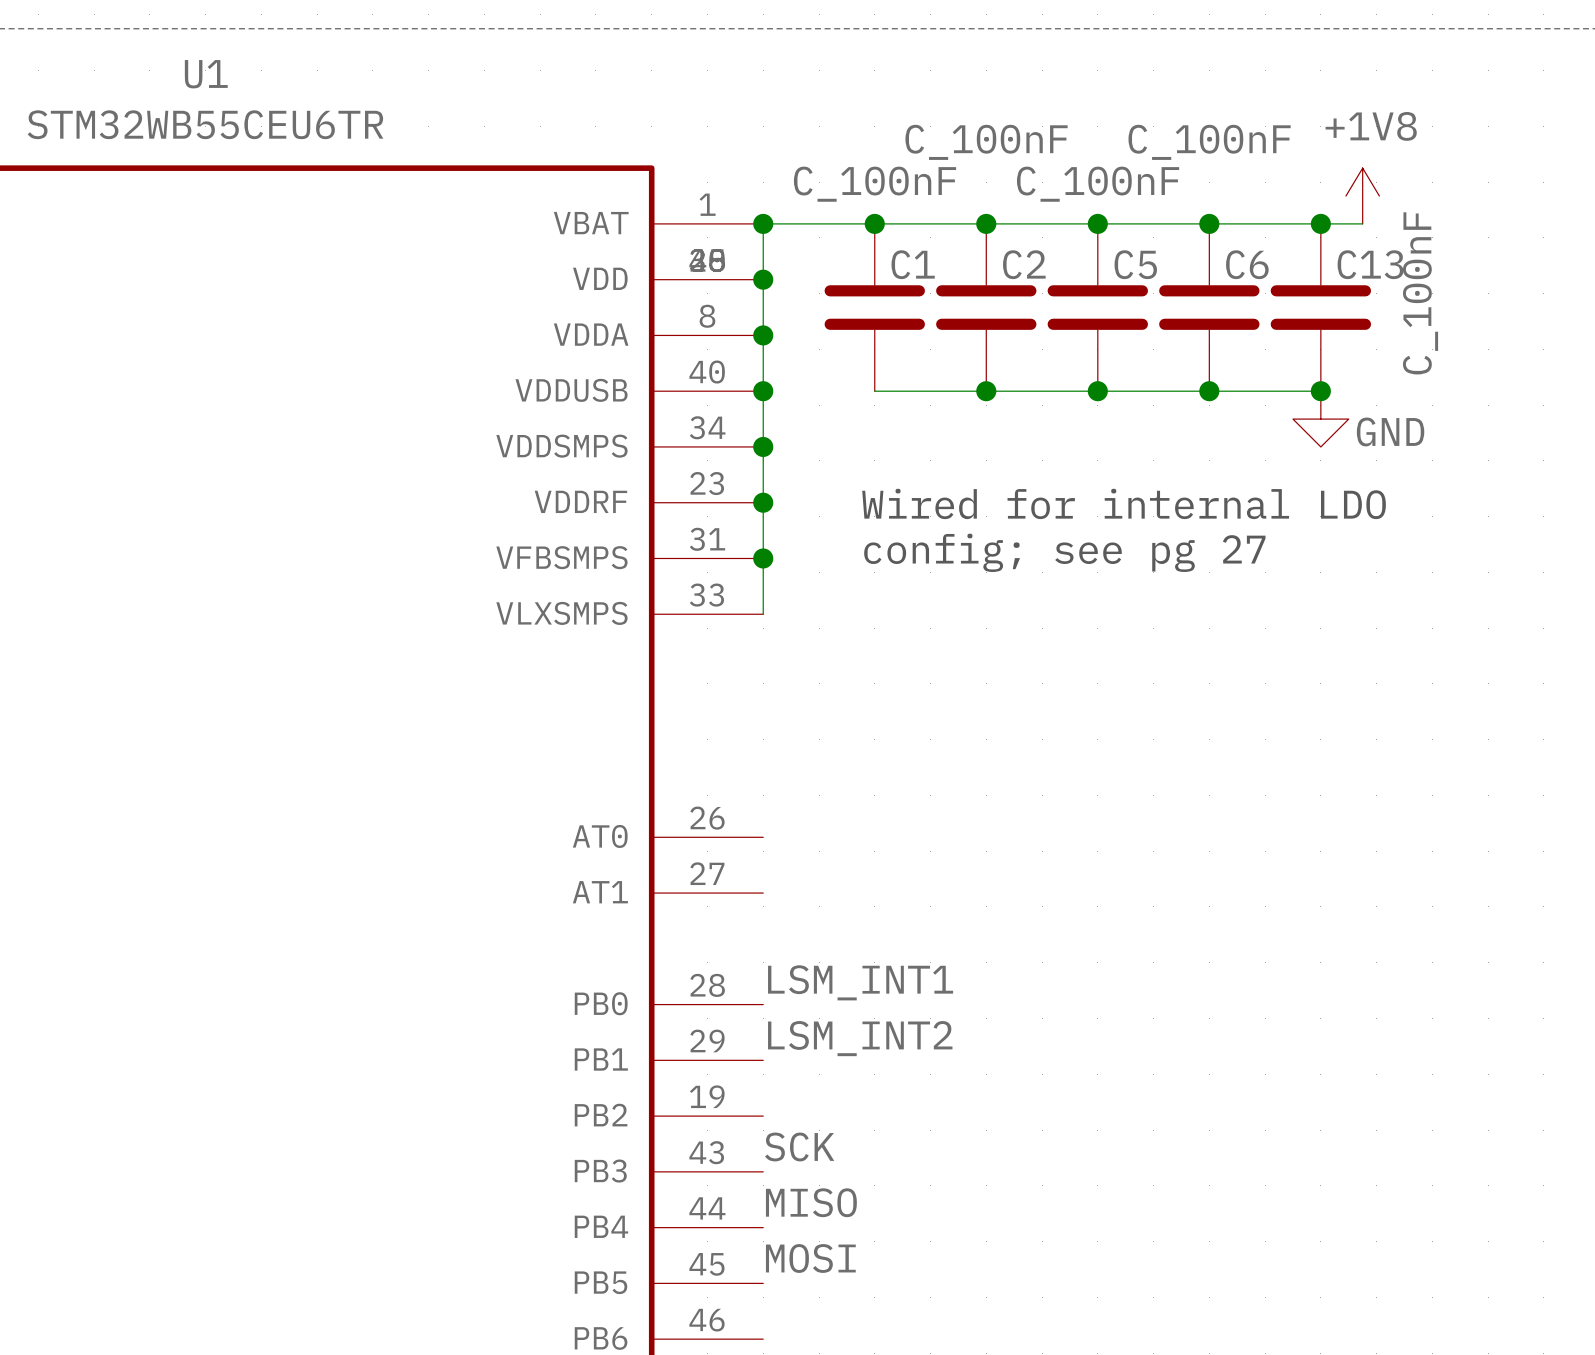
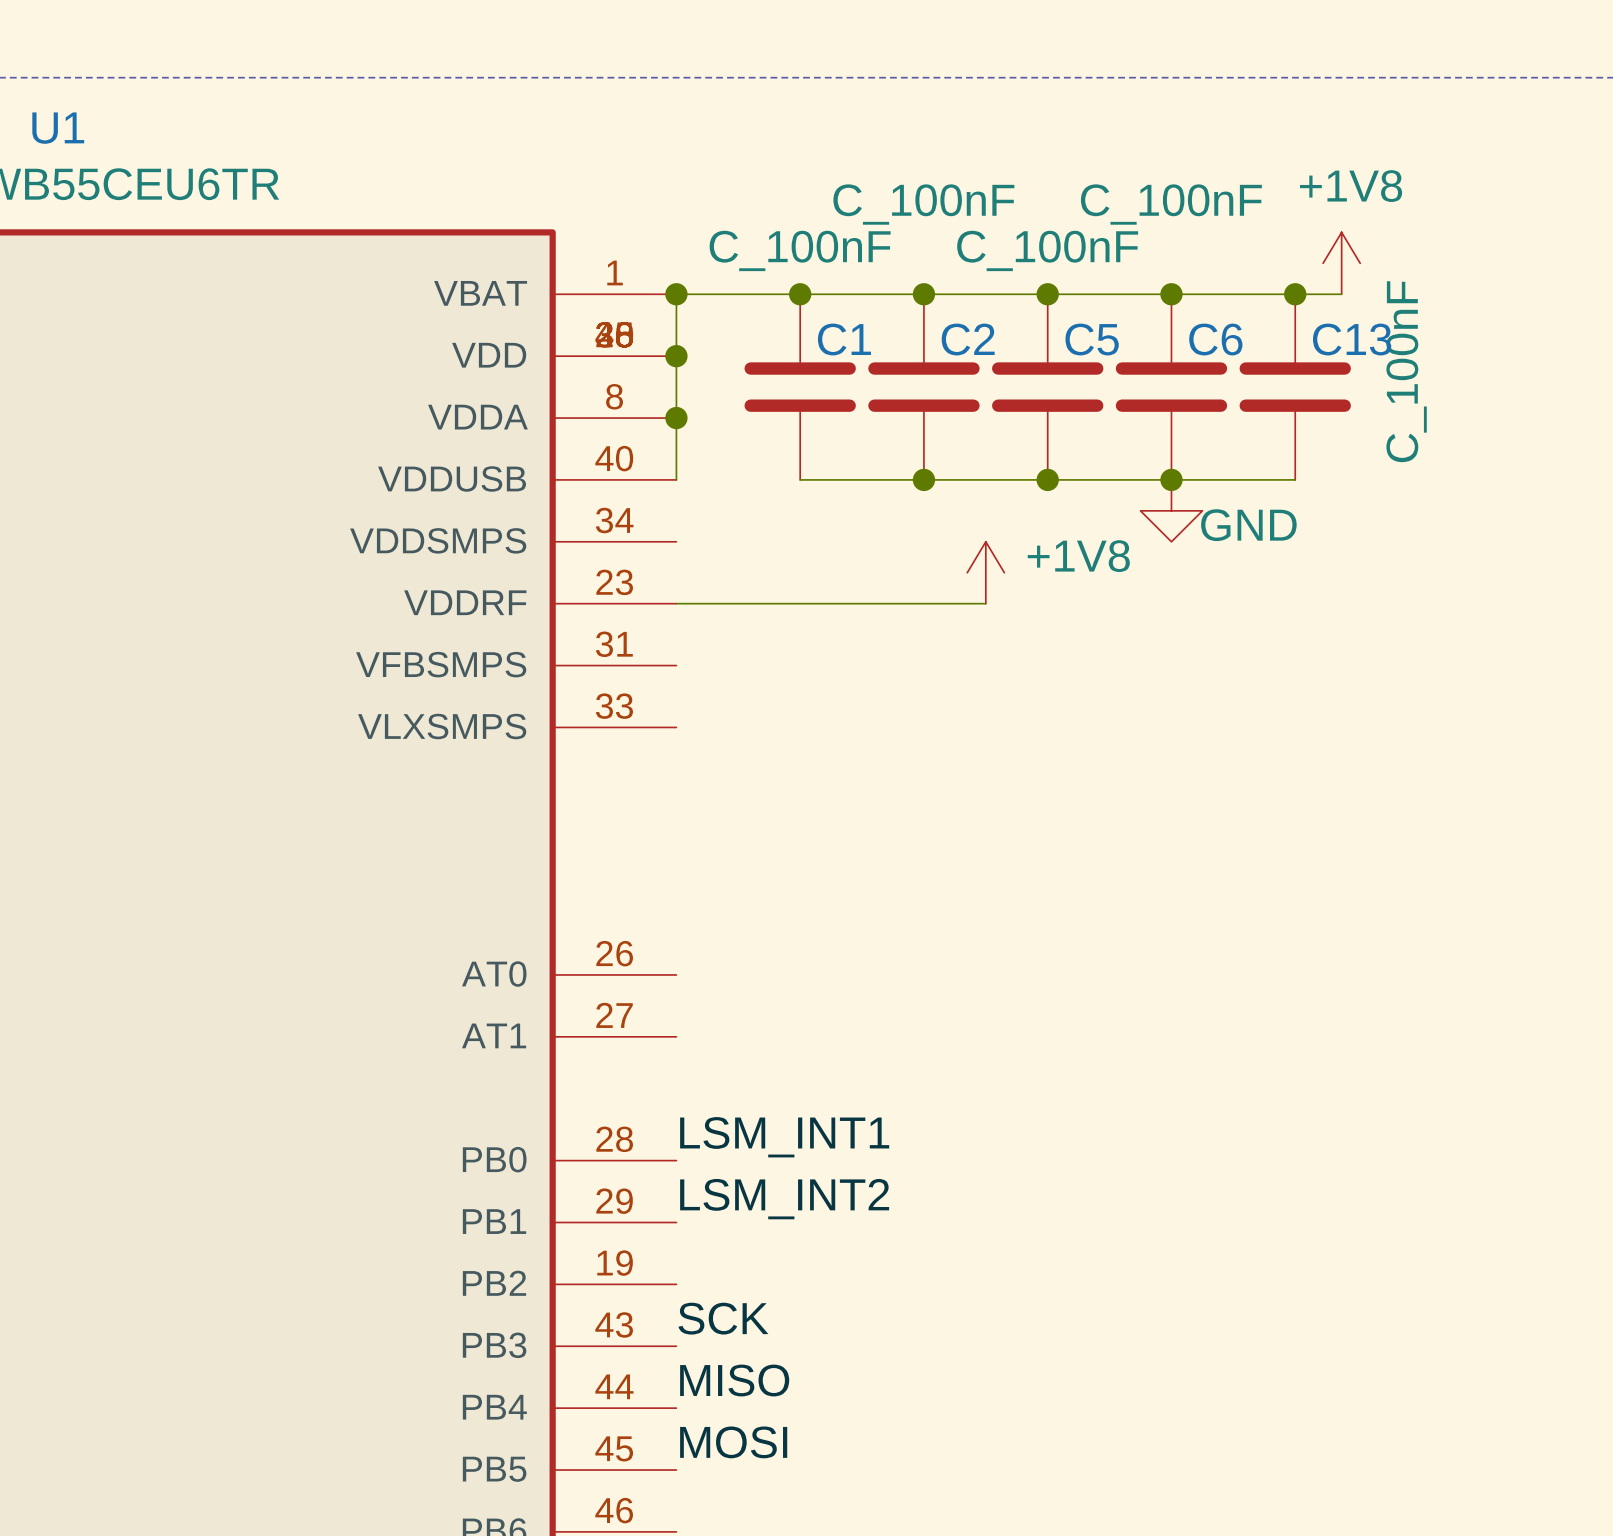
wire: (763, 391) (763, 614) -> none
junction: (763, 391) -> none
junction: (1320, 391) -> none
power symbol position: GND (1320, 419) -> GND (1171, 510)
junction: (763, 446) -> none
power symbol: none -> +1V8 (985, 572)
wire: none -> (676, 603) (985, 603)
junction: (763, 502) -> none
text: Wired for internal LDO (1124, 503) -> none
text: config; see pg 27 (1064, 552) -> none
junction: (763, 558) -> none

